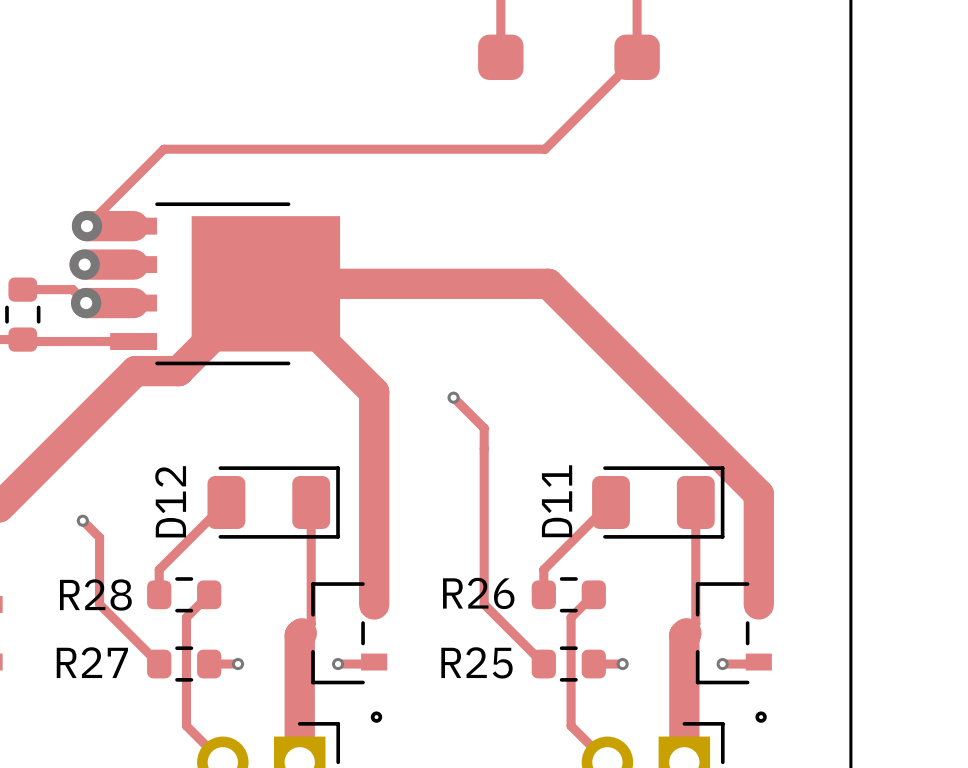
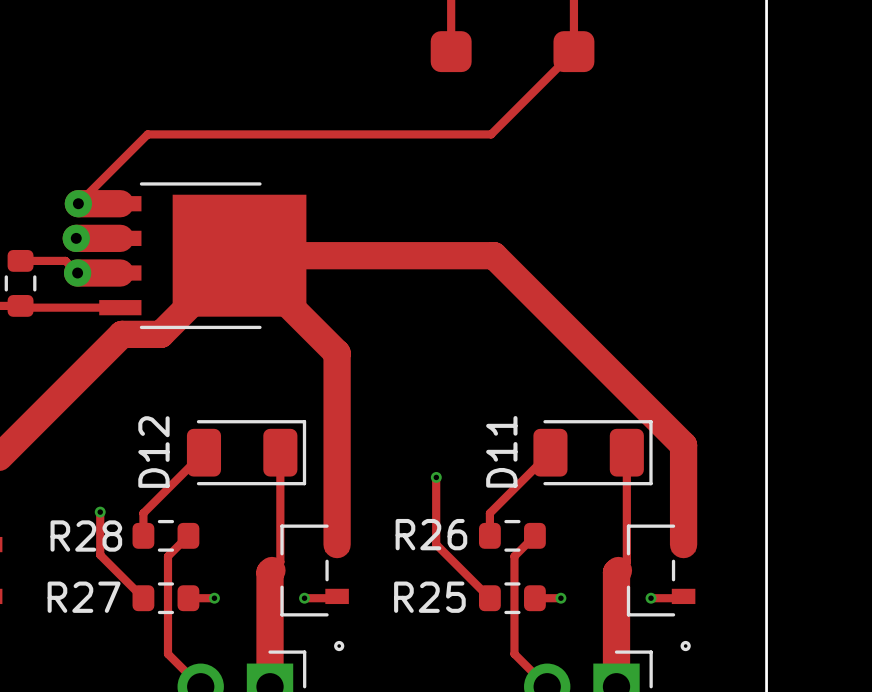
track: (453, 397) (484, 428) (484, 530) -> none
via position: (453, 397) -> (436, 477)
track: (82, 520) (99, 537) (99, 604) (111, 616) -> (100, 512) (100, 555)
via position: (82, 520) -> (100, 512)

